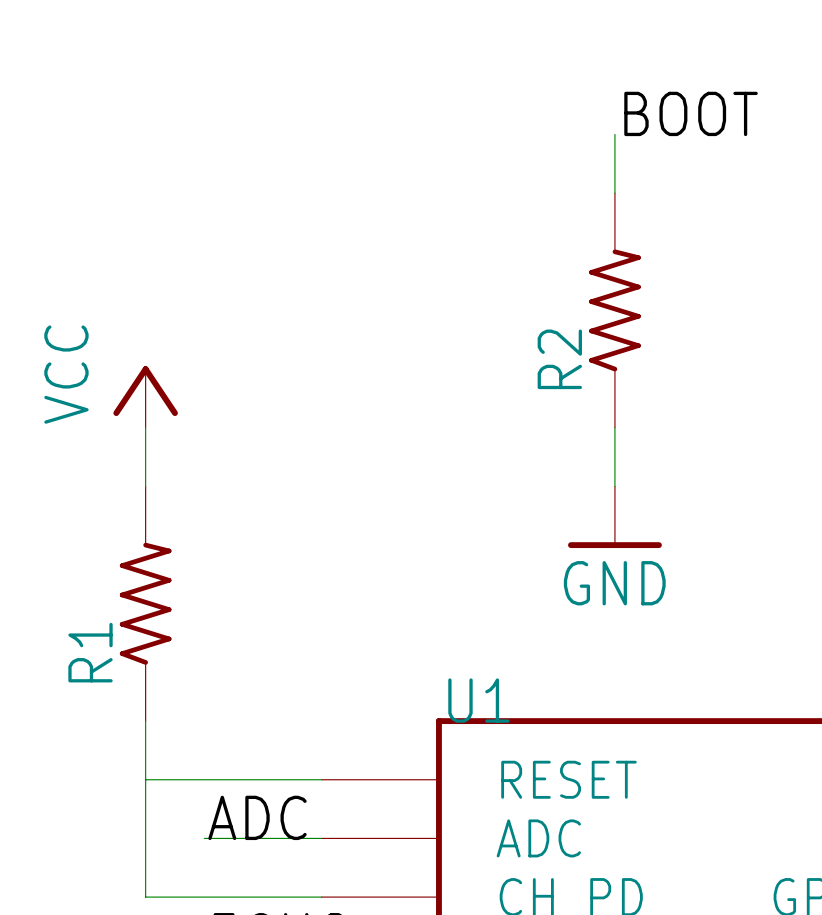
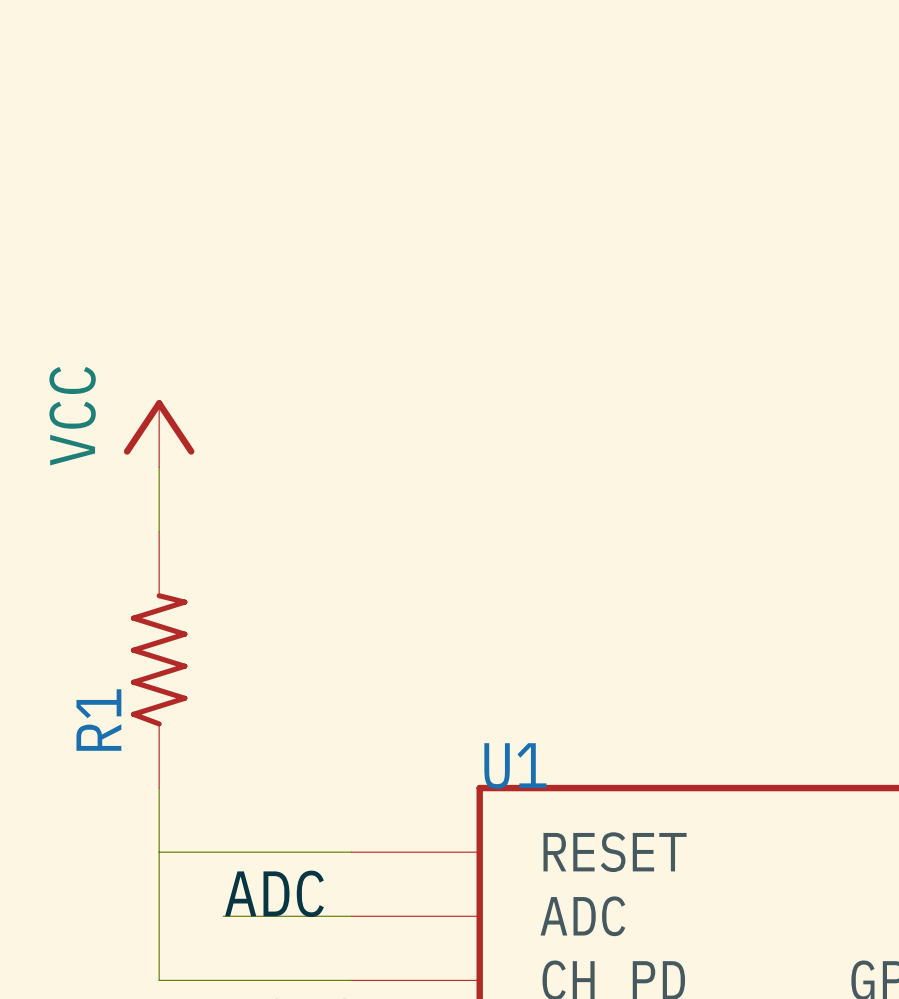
label: BOOT (691, 113) -> none
wire: (614, 134) (614, 193) -> none
R2: (614, 310) -> none
wire: (614, 427) (614, 486) -> none
power symbol: GND (614, 517) -> none

